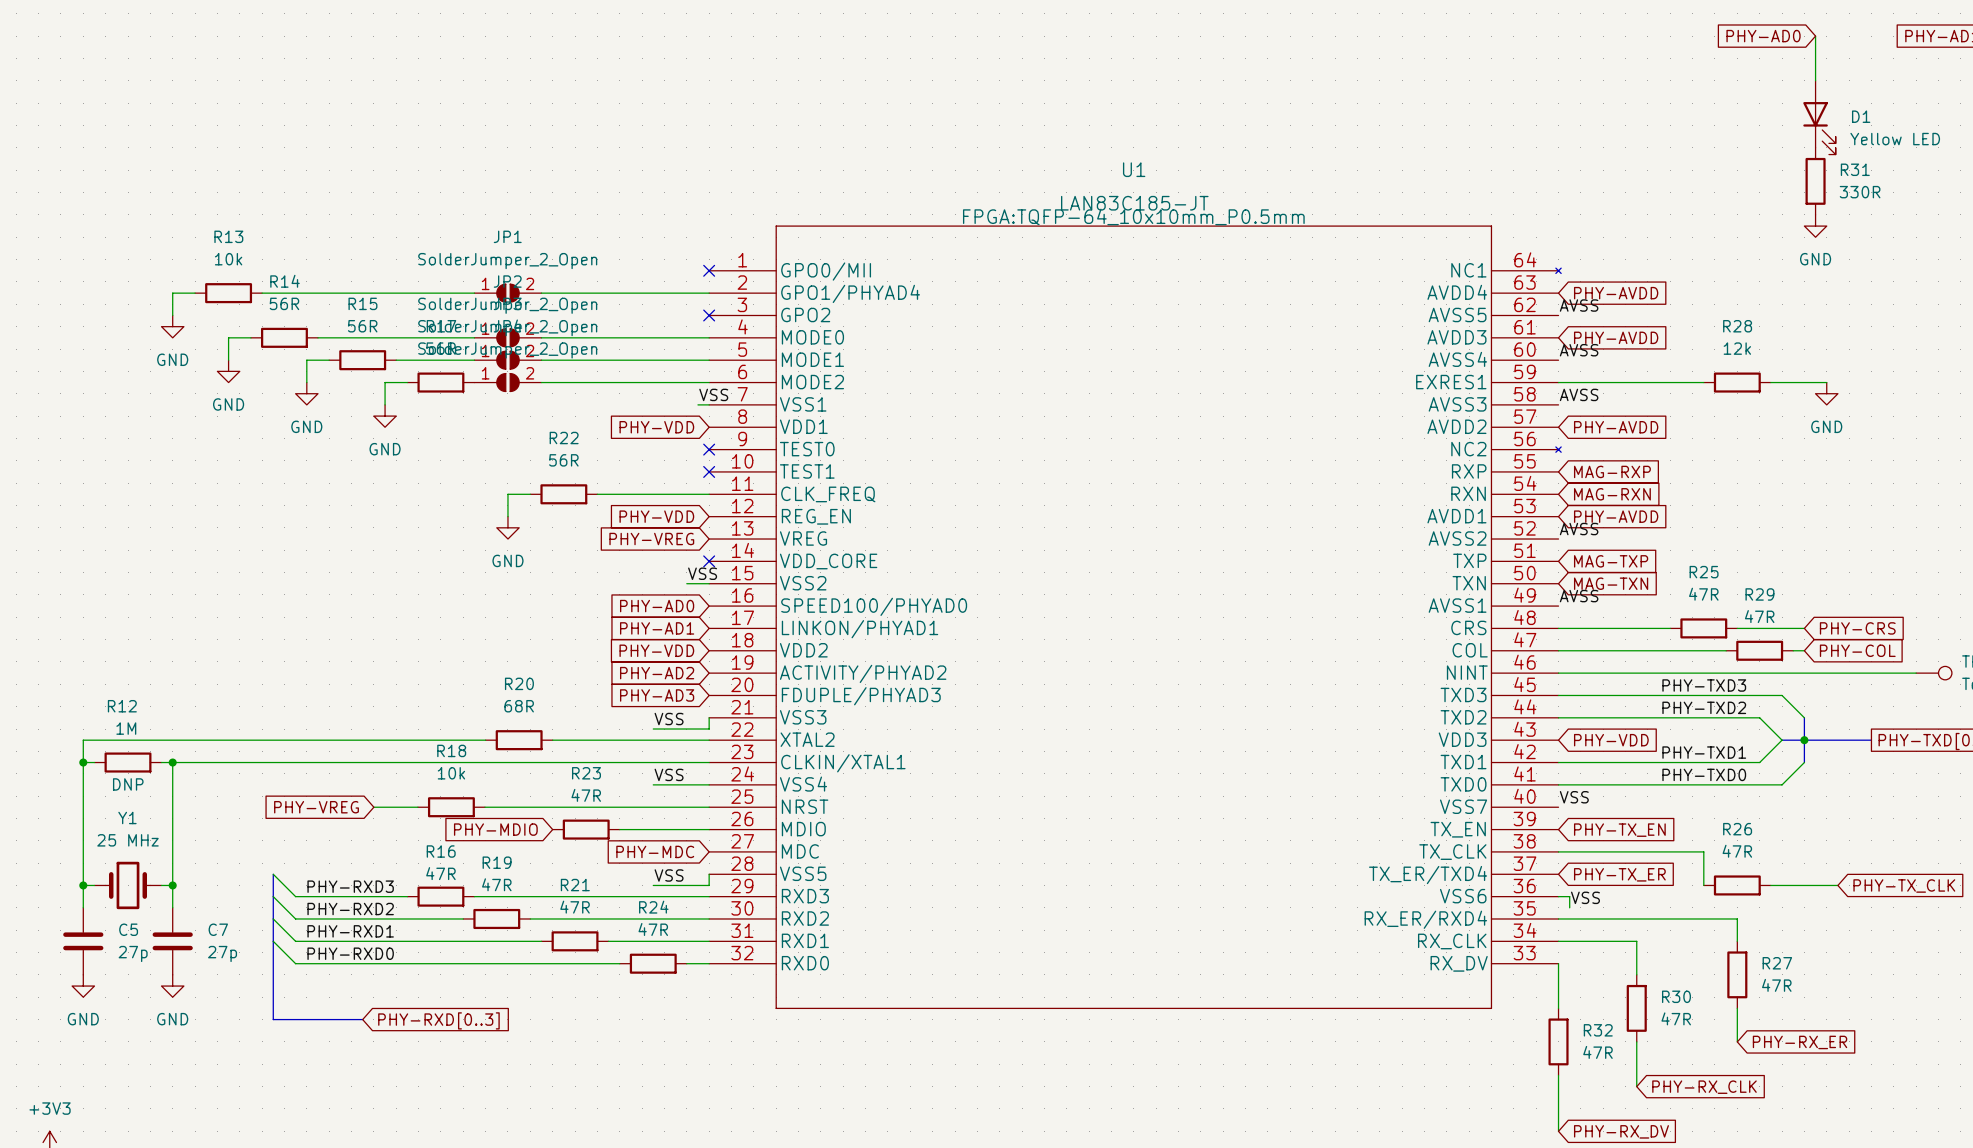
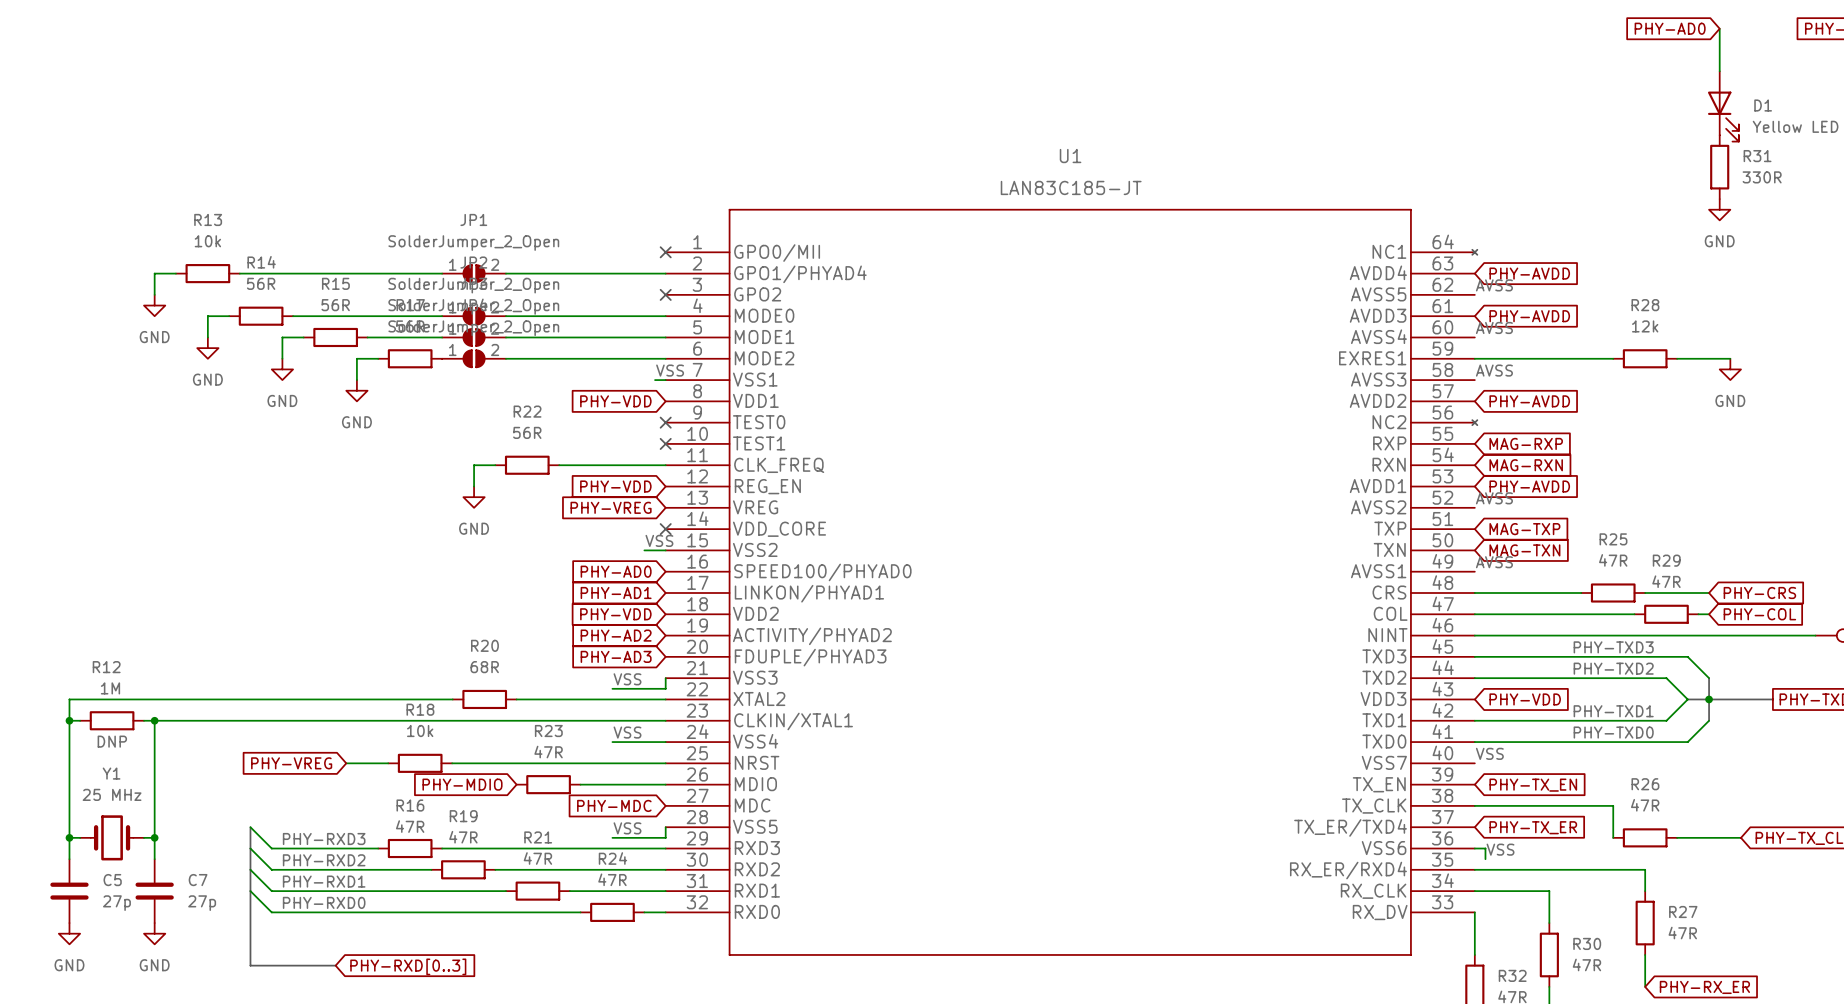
U1 text: FPGA:TQFP-64_10x10mm_P0.5mm (1133, 216) -> none

